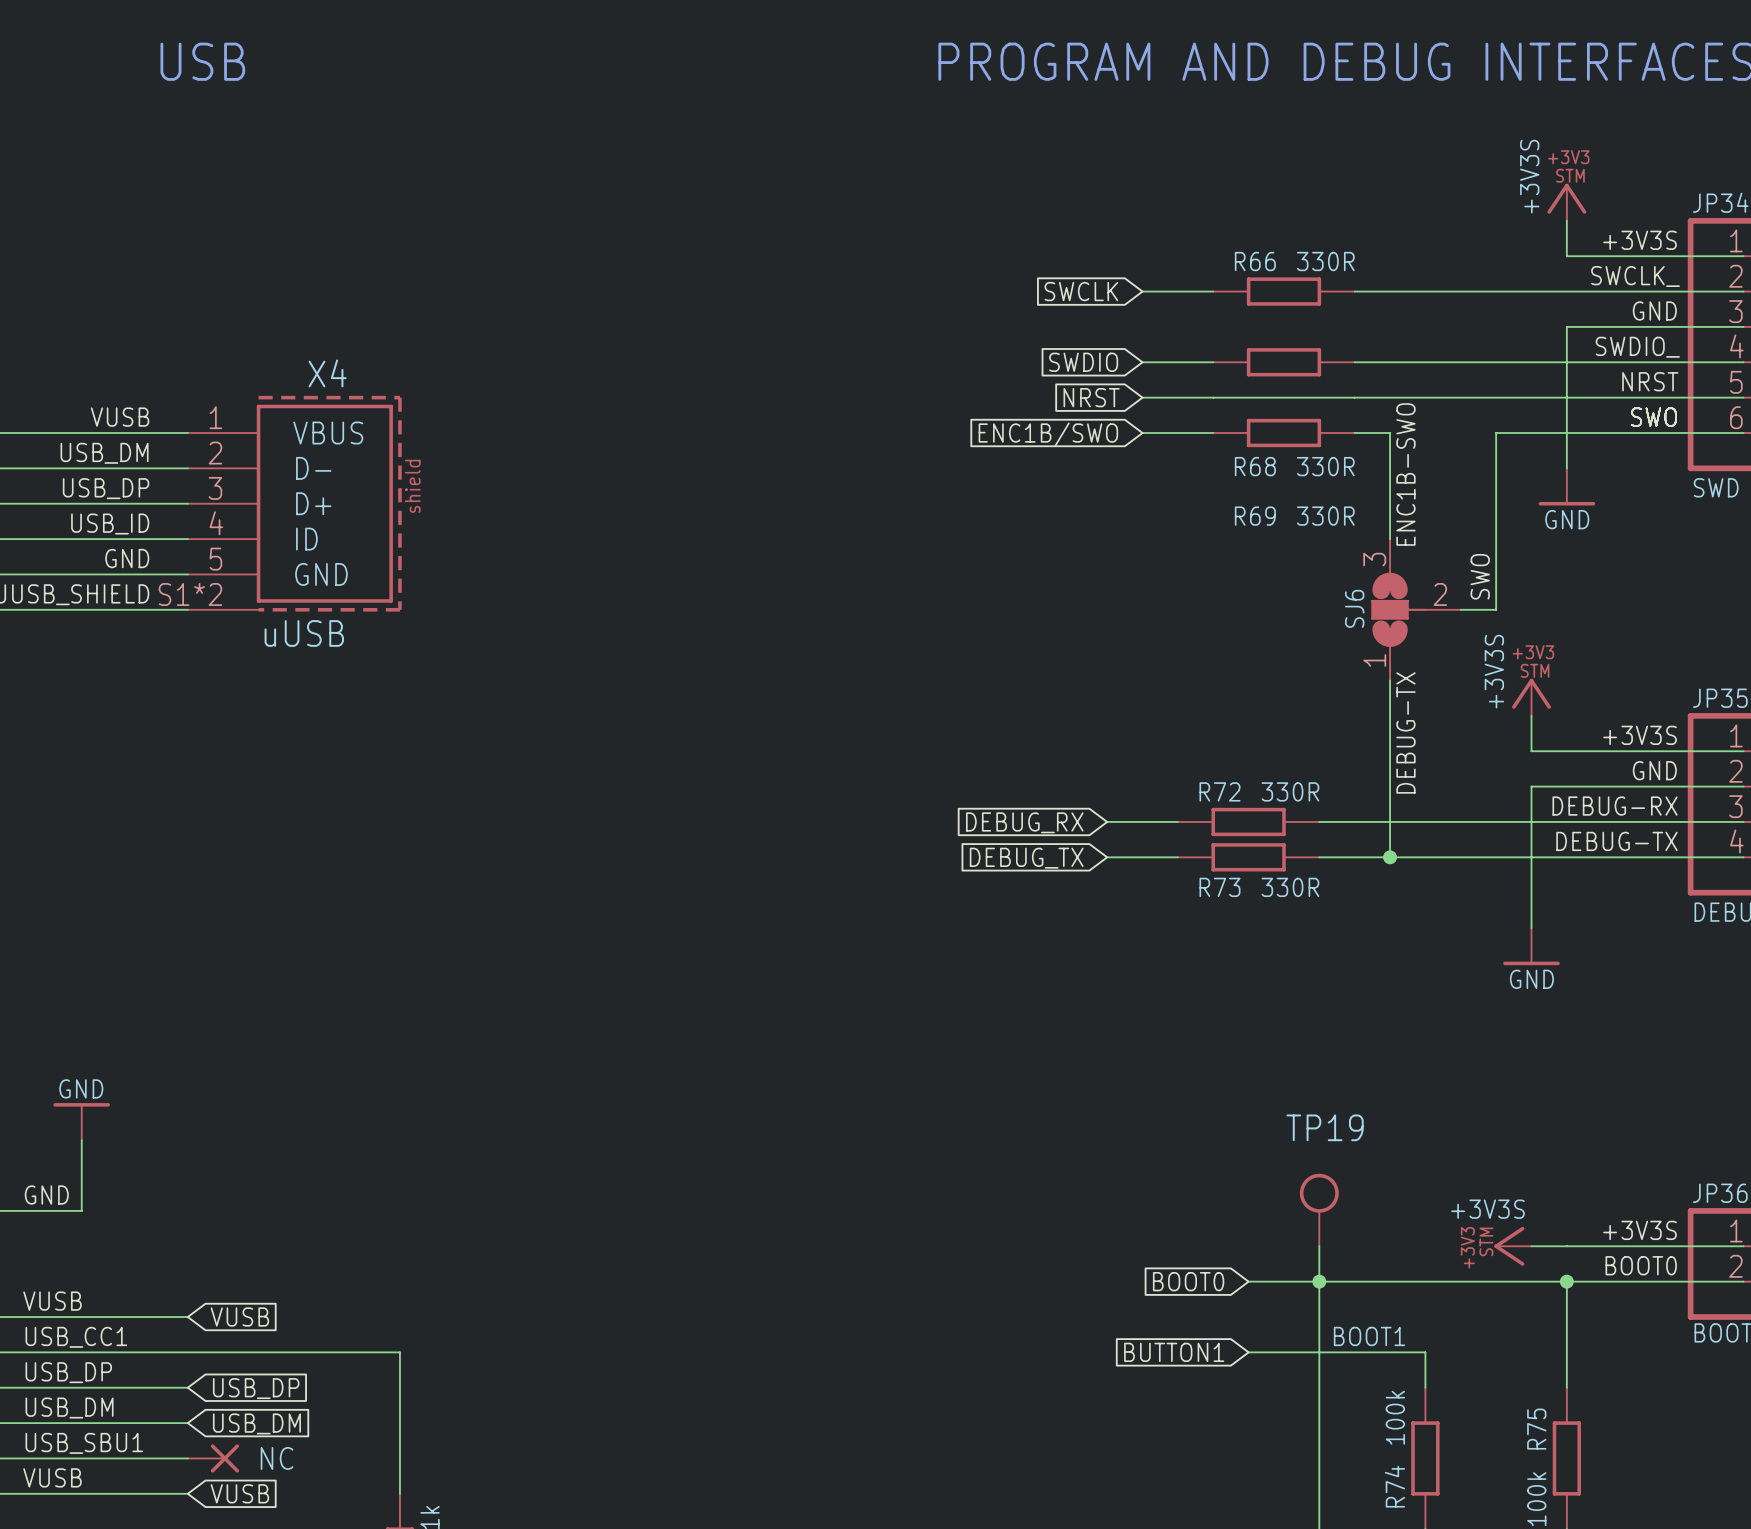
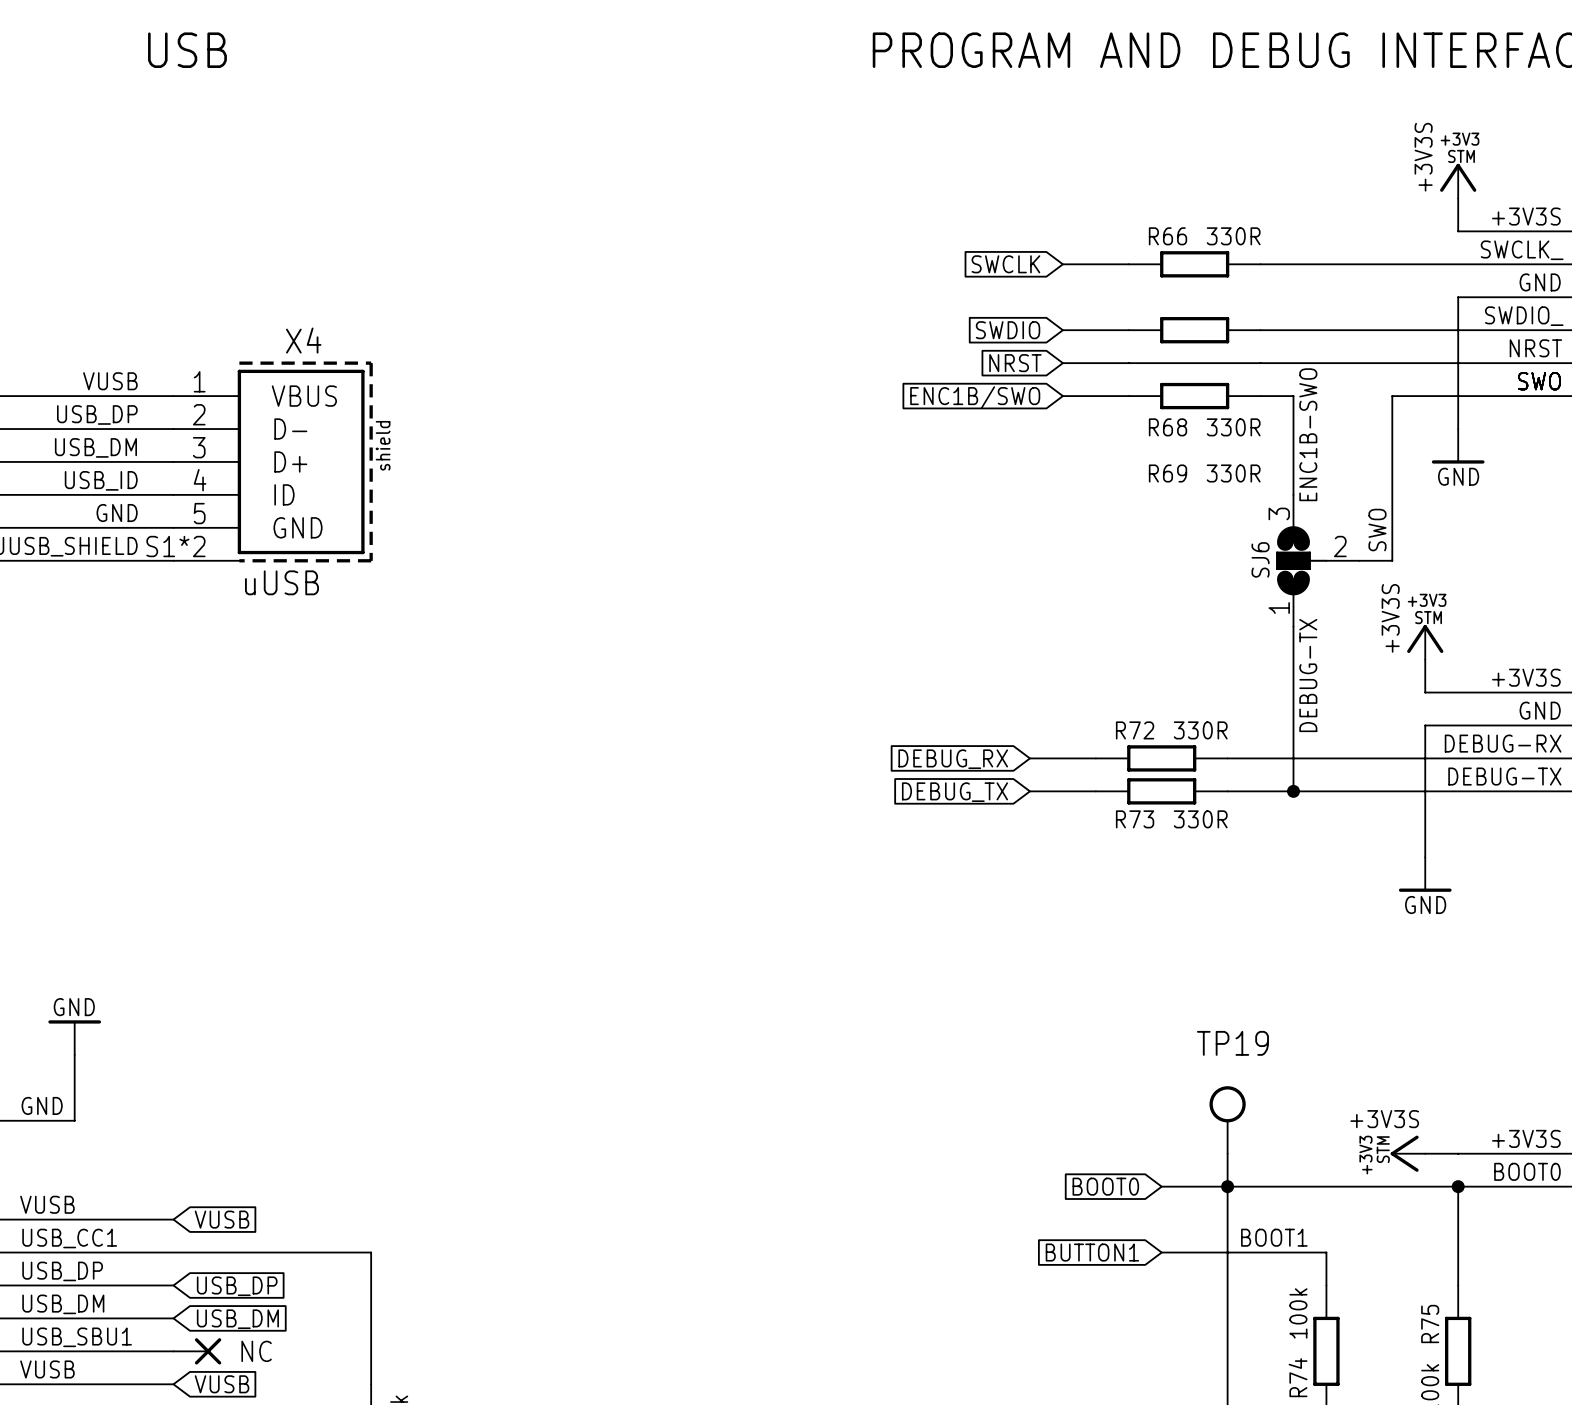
label: USB_DM (104, 453) -> USB_DP (97, 414)
label: USB_DP (106, 488) -> USB_DM (95, 447)

